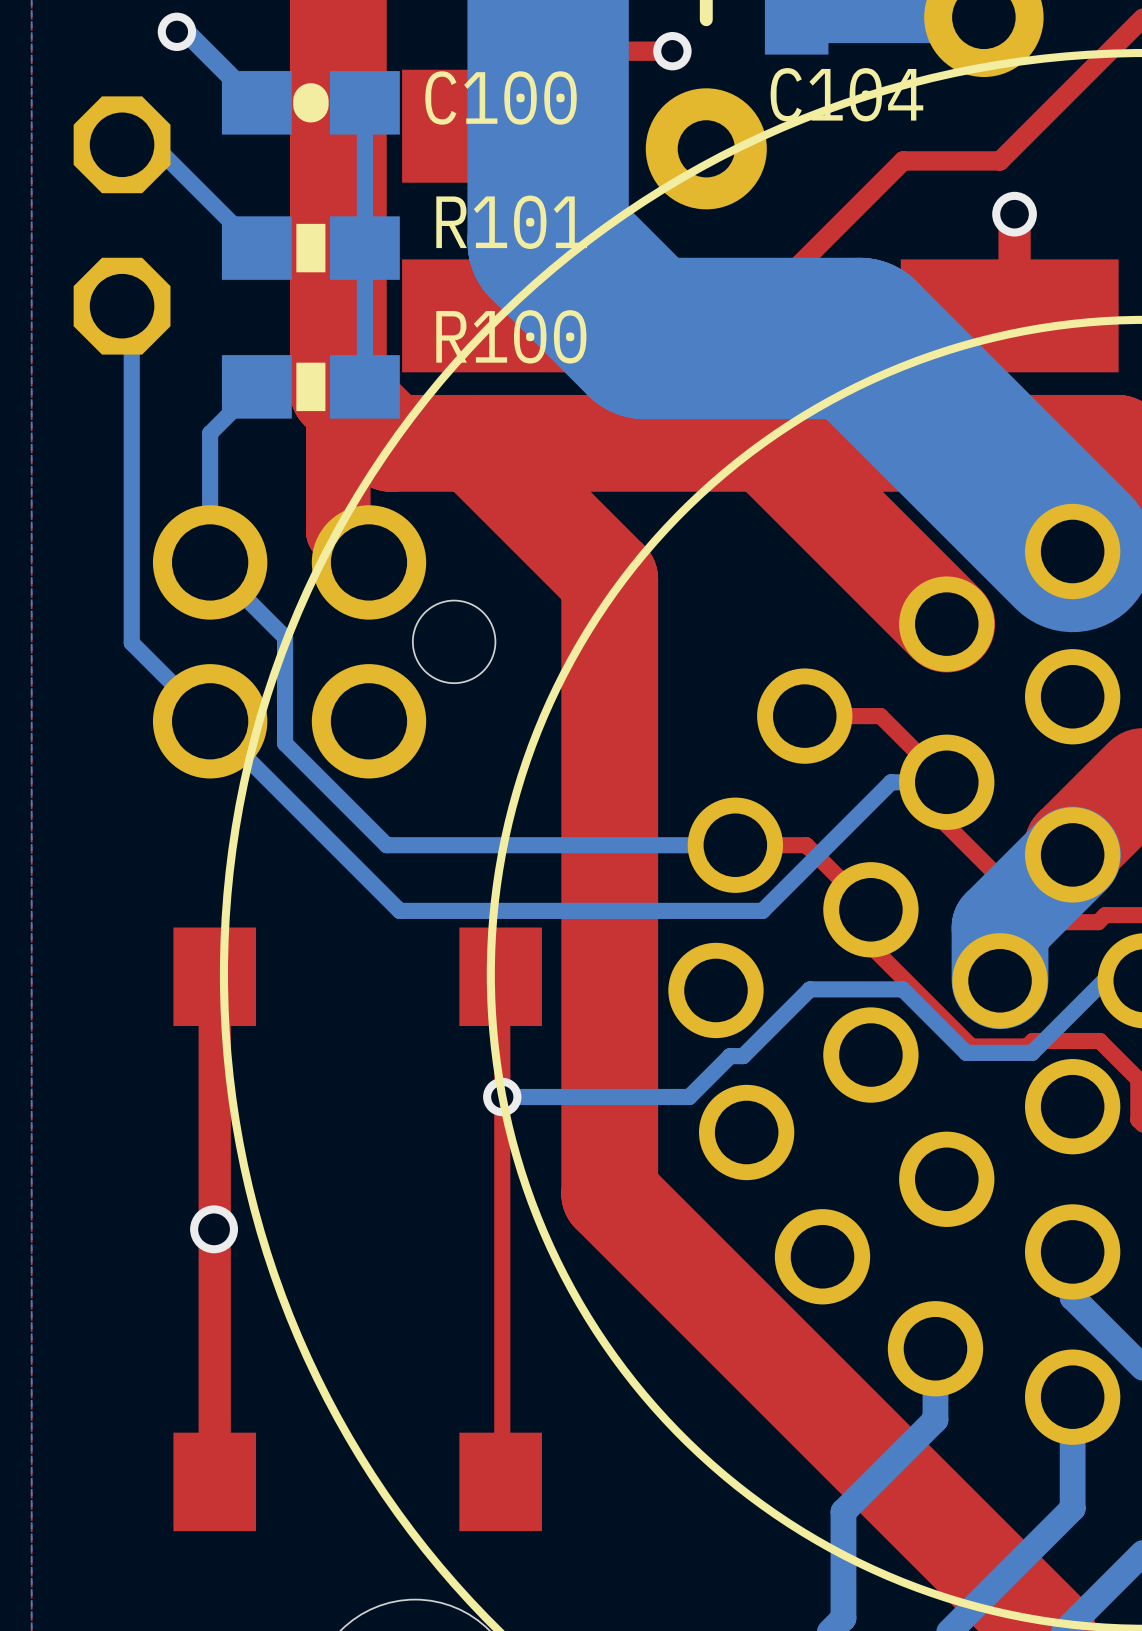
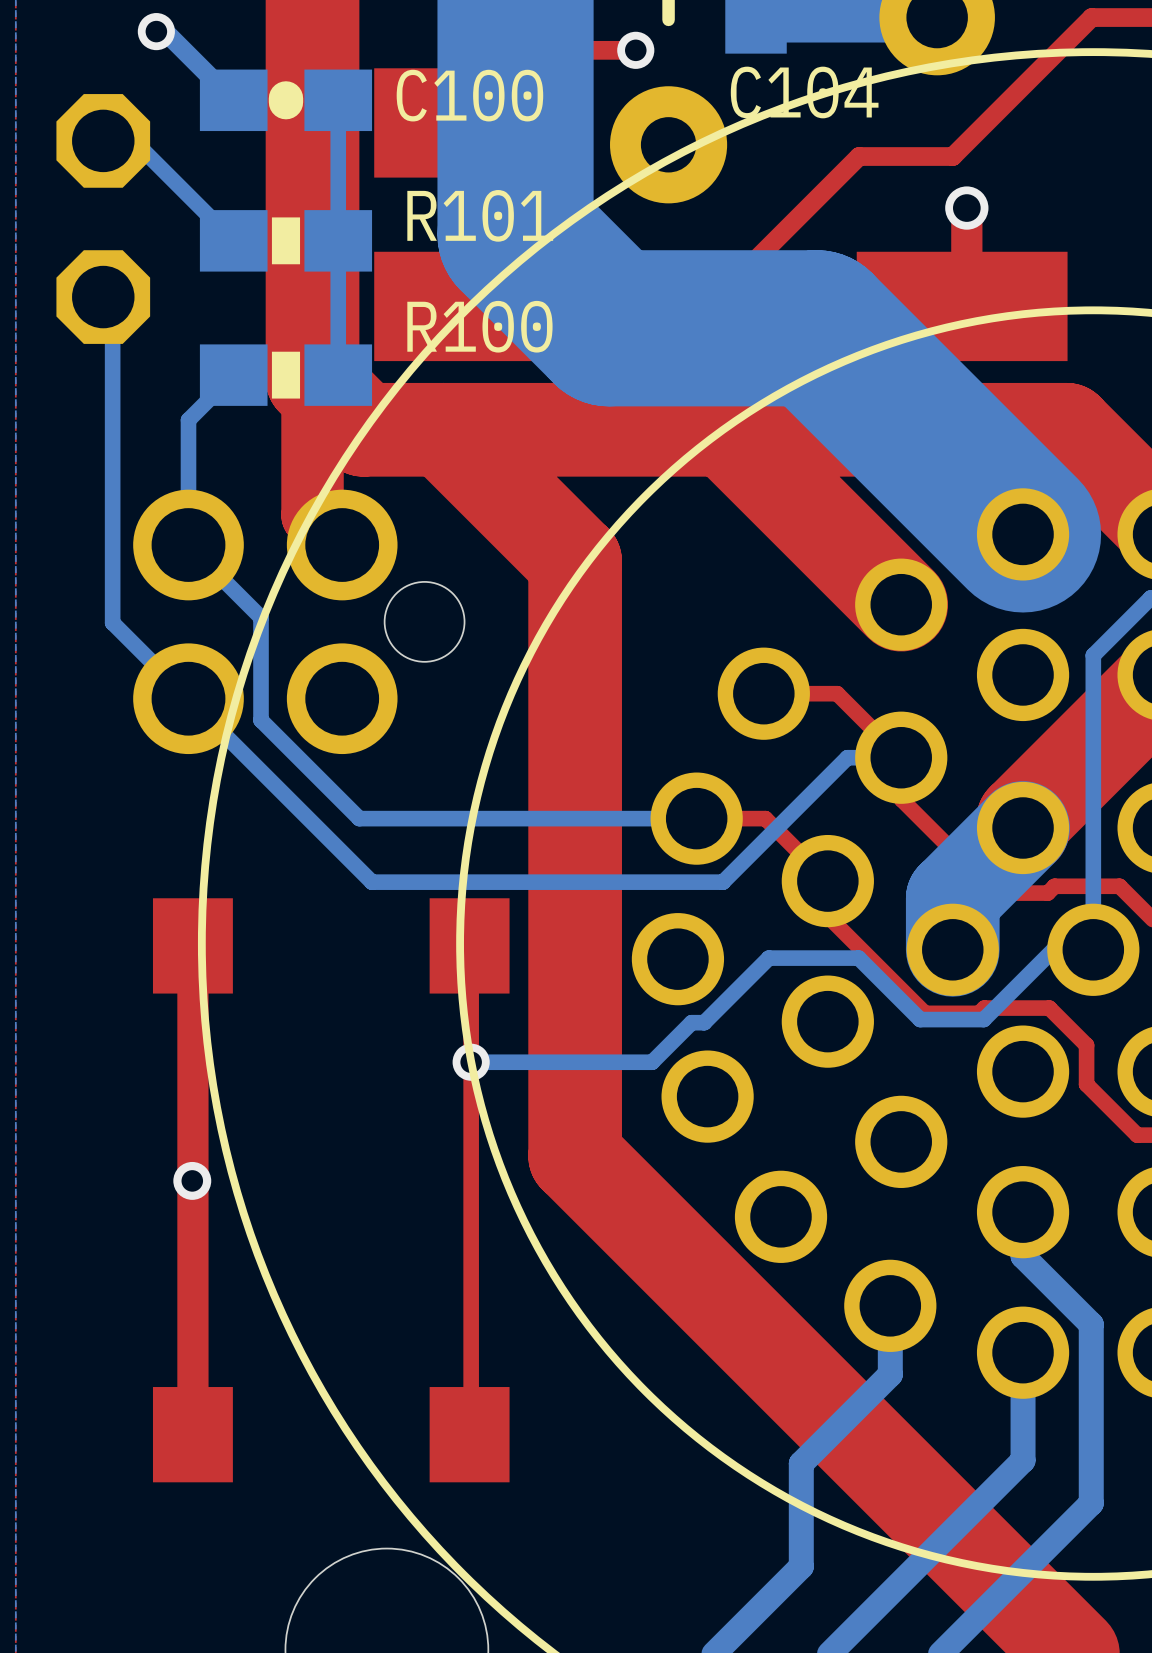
via size: [190, 1205, 239, 1254] -> [173, 1161, 212, 1200]

